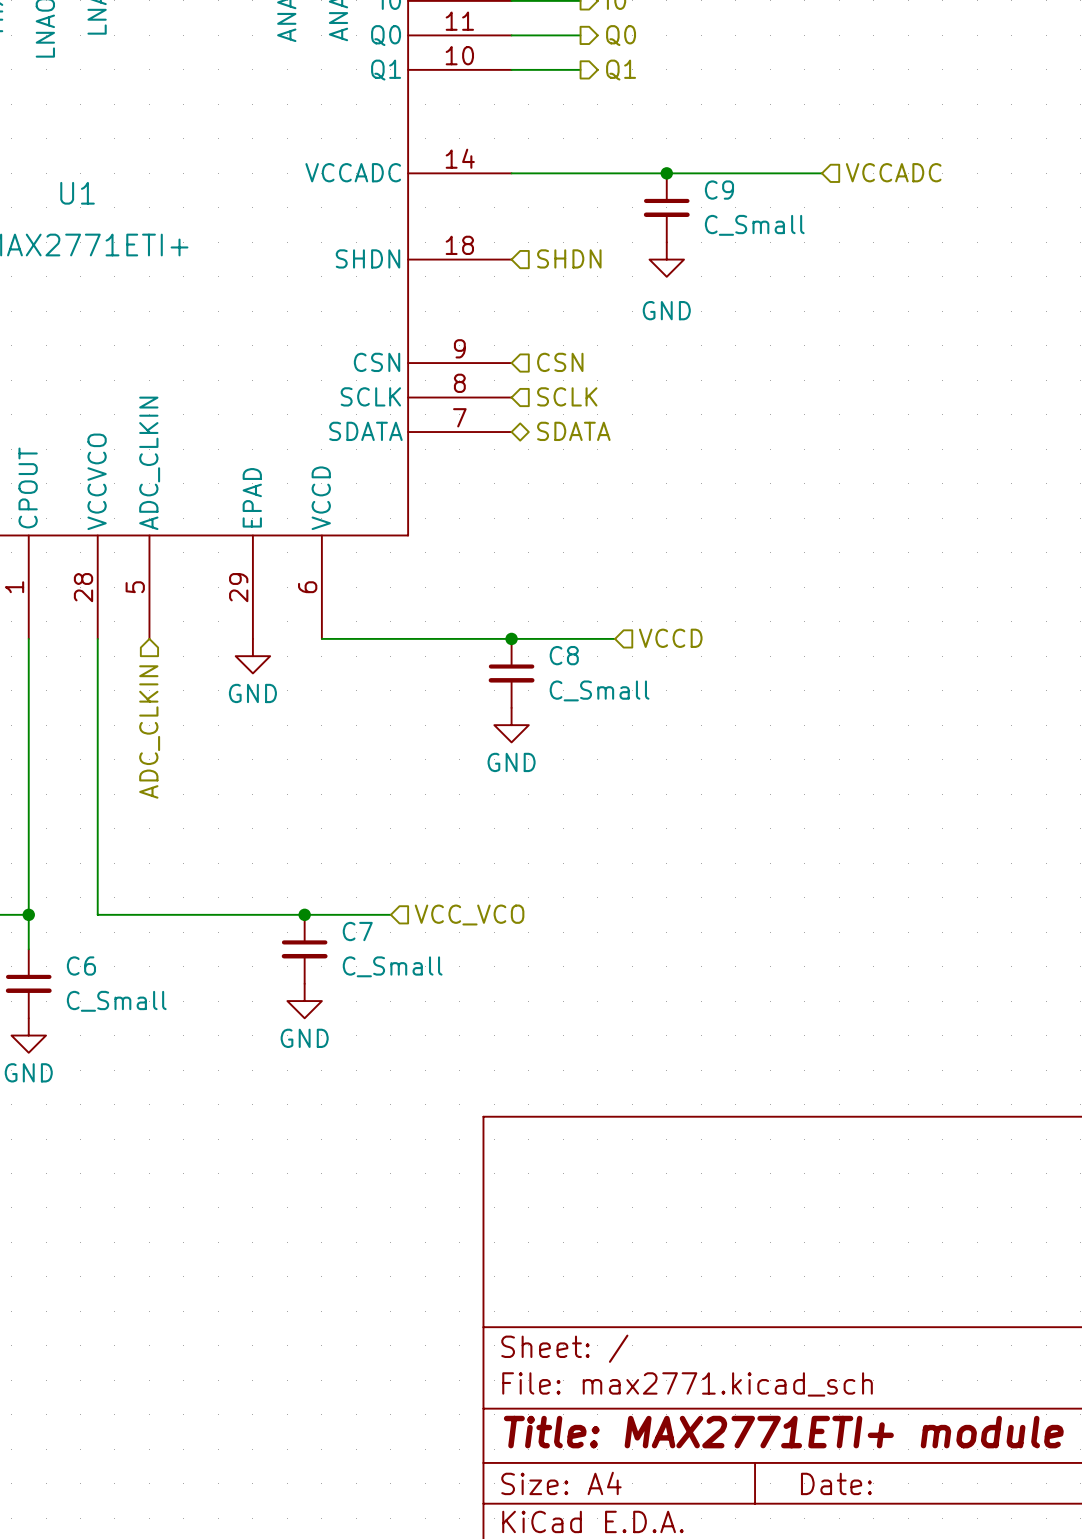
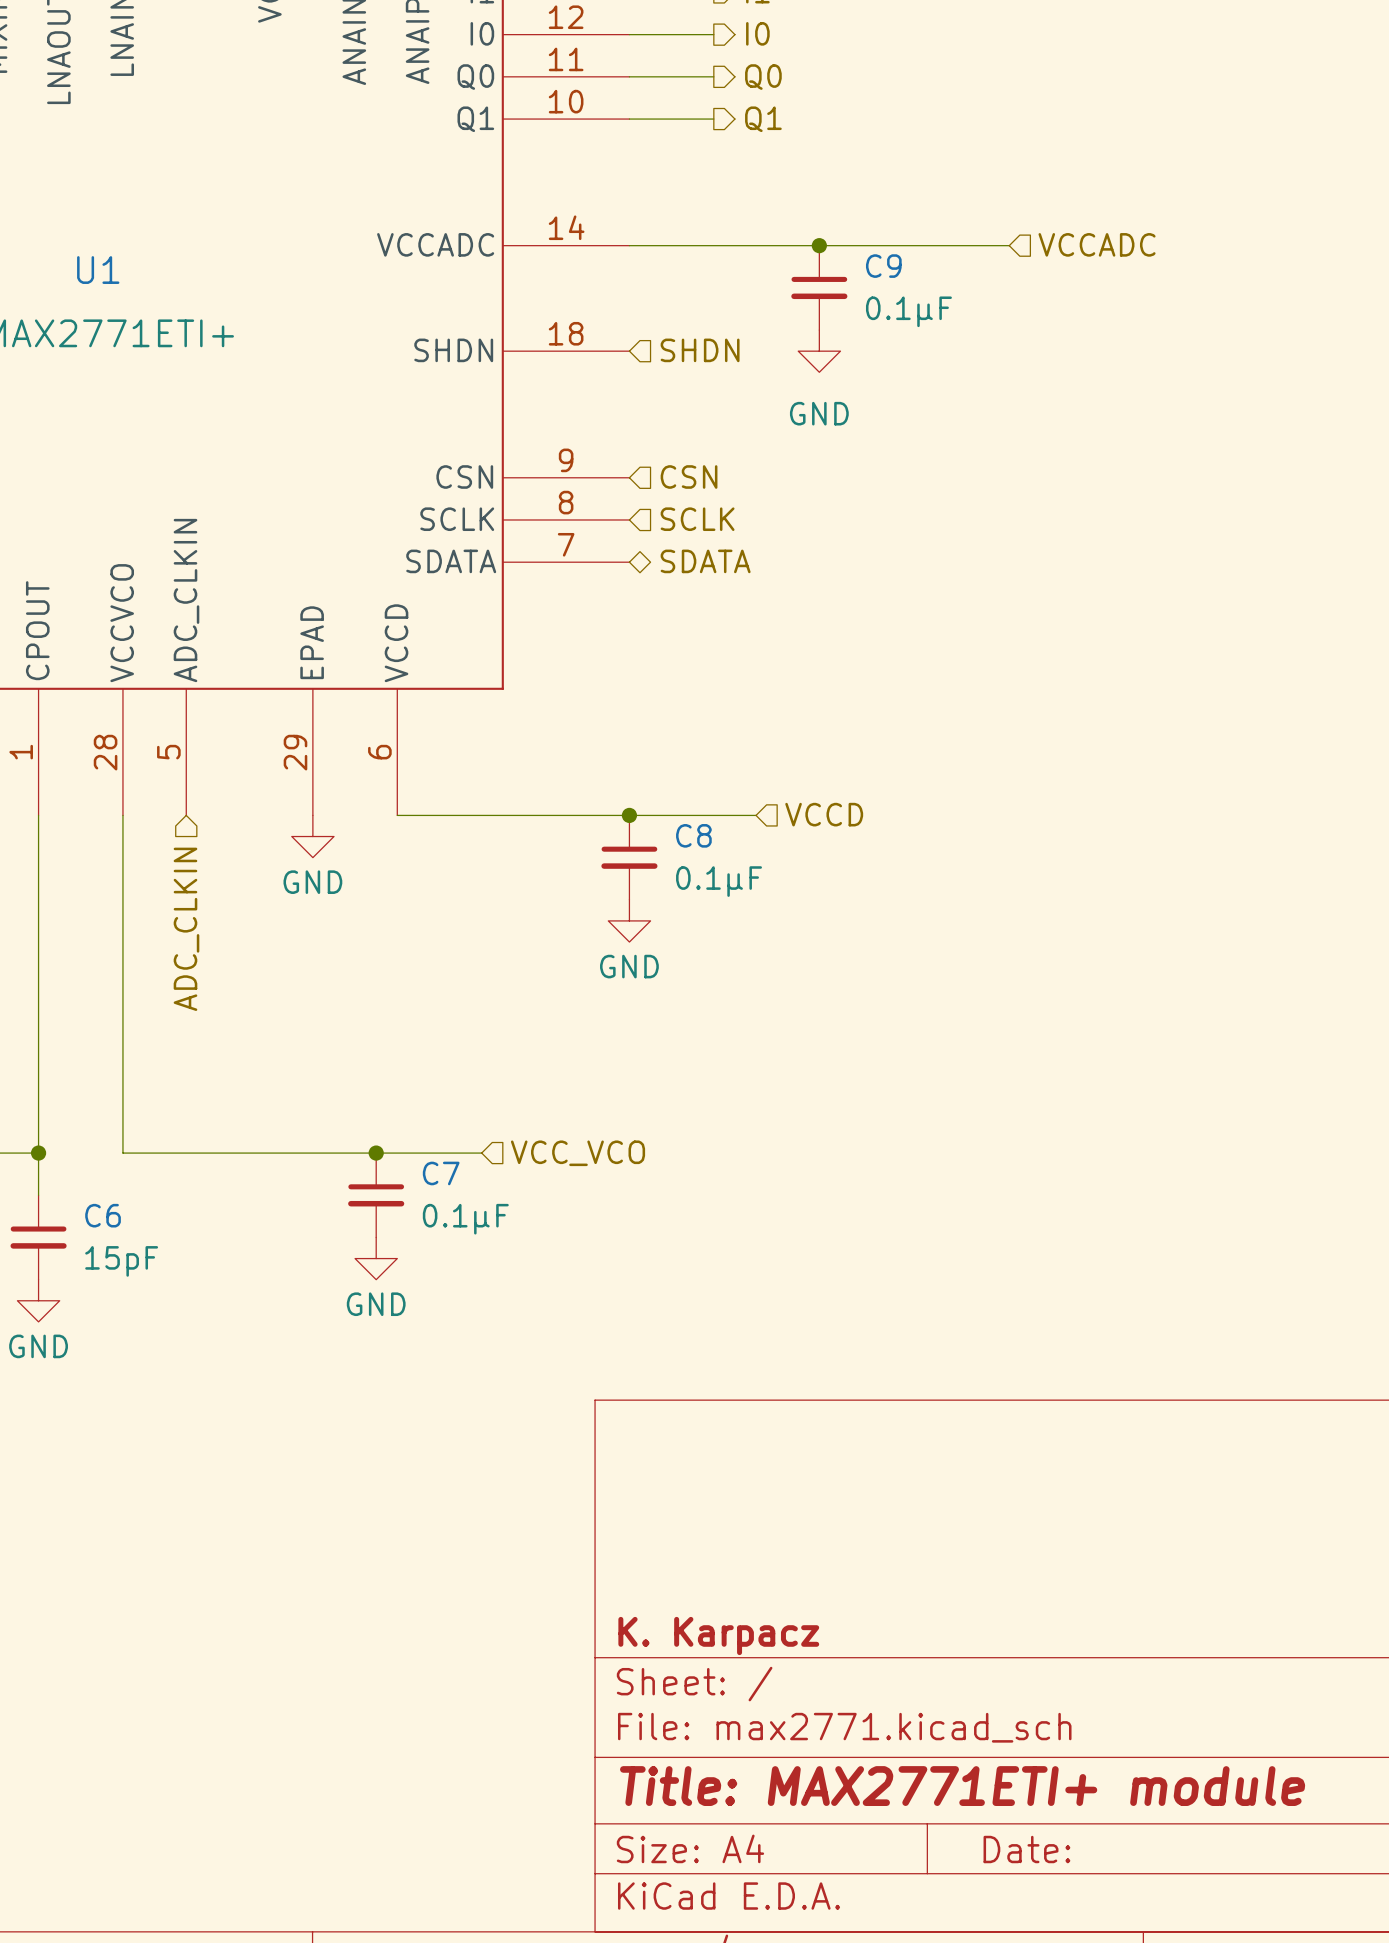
C9 value: C_Small (754, 225) -> 0.1μF (908, 311)
C8 value: C_Small (599, 690) -> 0.1μF (719, 881)
C7 value: C_Small (392, 966) -> 0.1μF (465, 1219)
C6 value: C_Small (116, 1001) -> 15pF (121, 1261)
title block: none -> K. Karpacz (718, 1635)

